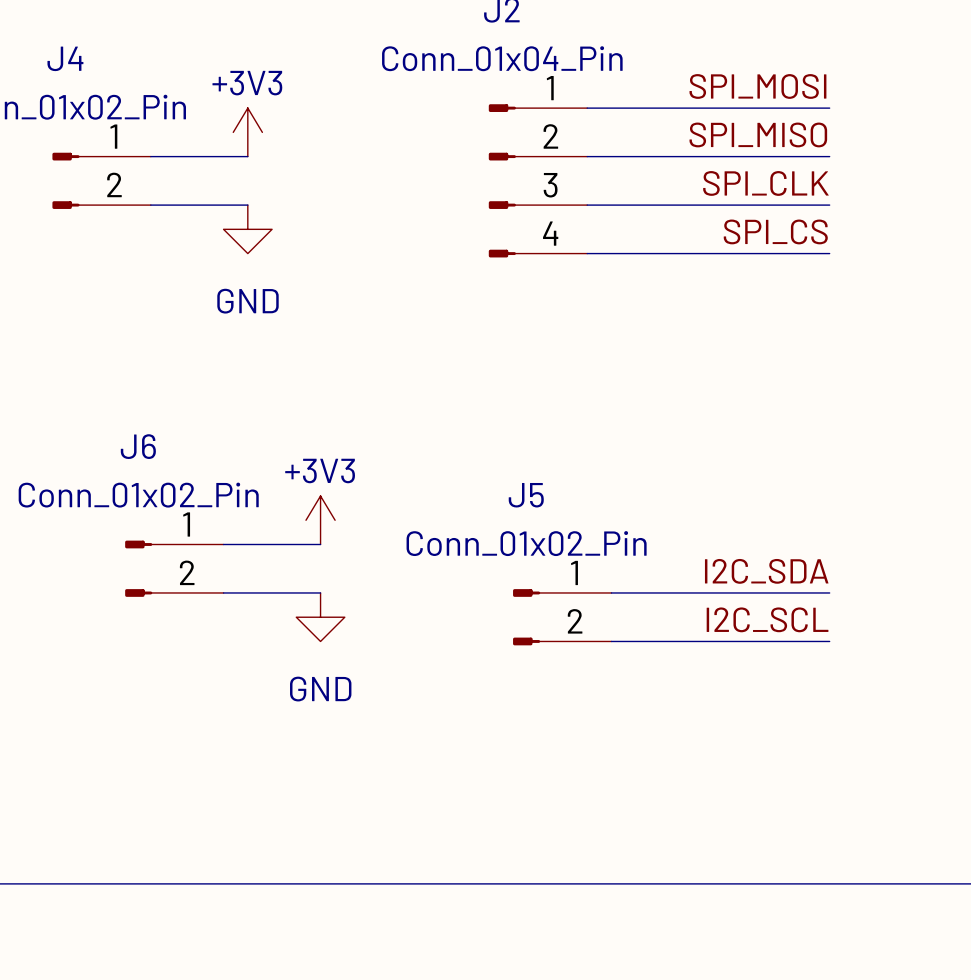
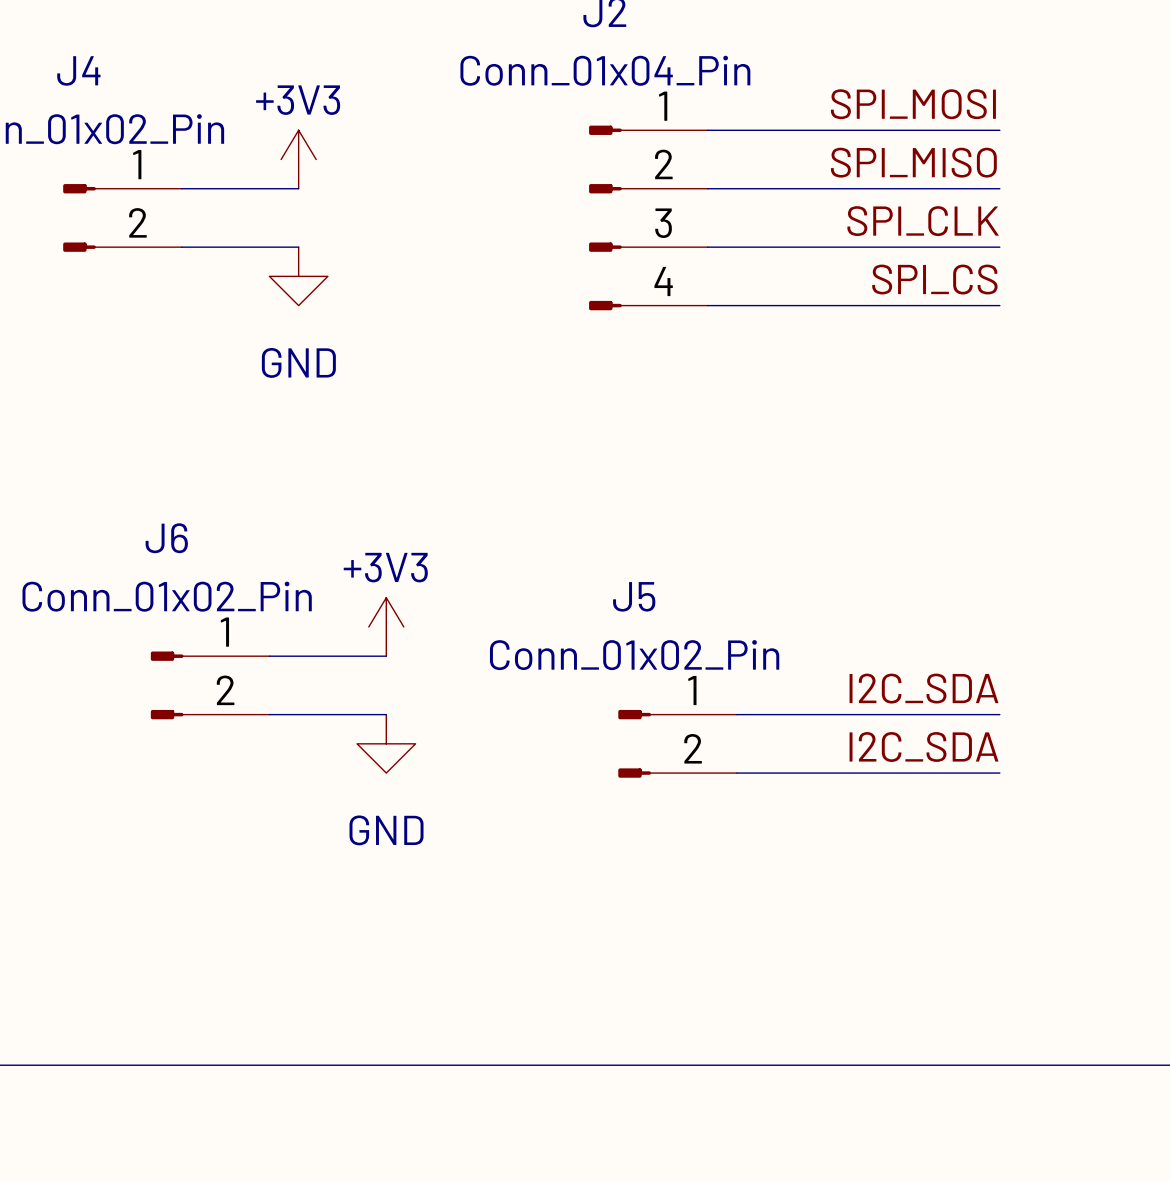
label: I2C_SCL (767, 619) -> I2C_SDA (923, 747)

